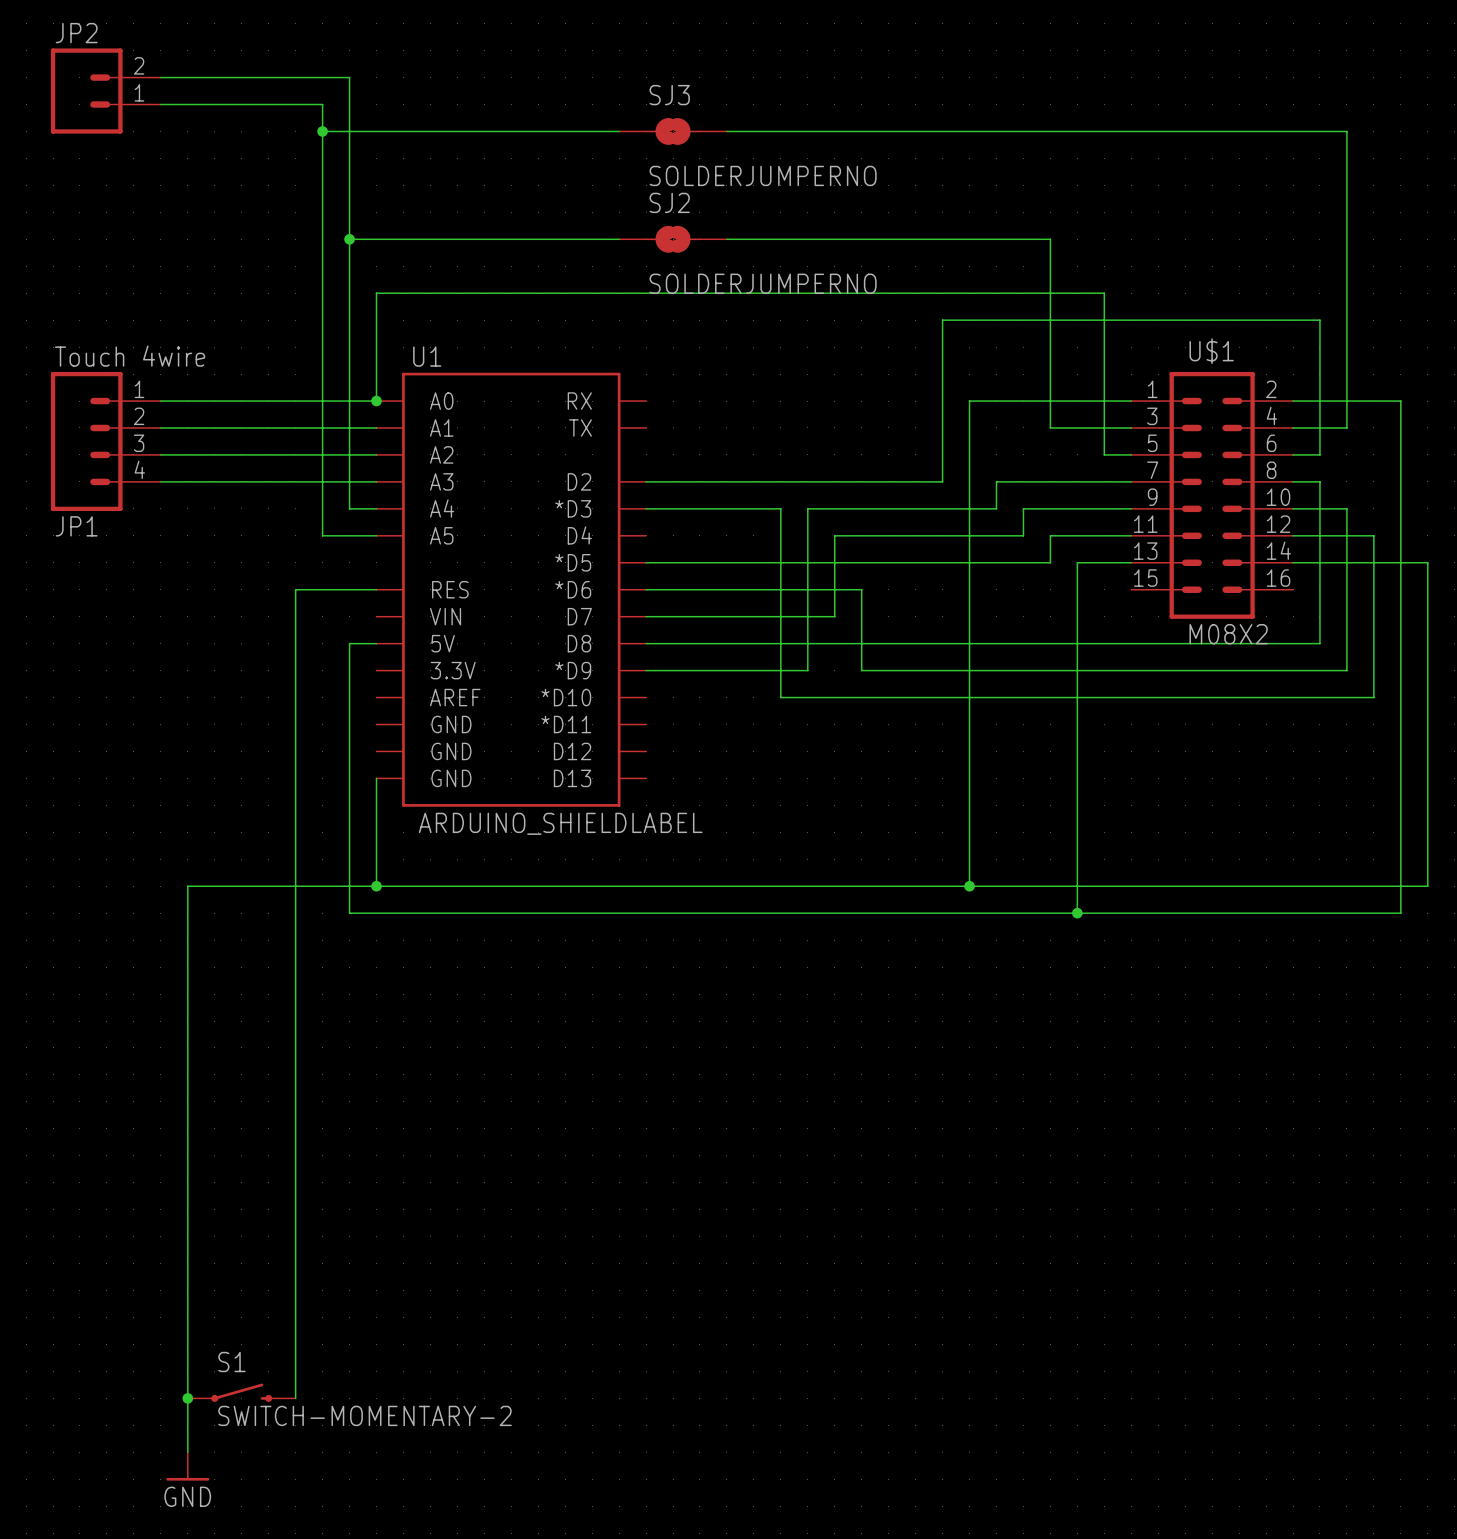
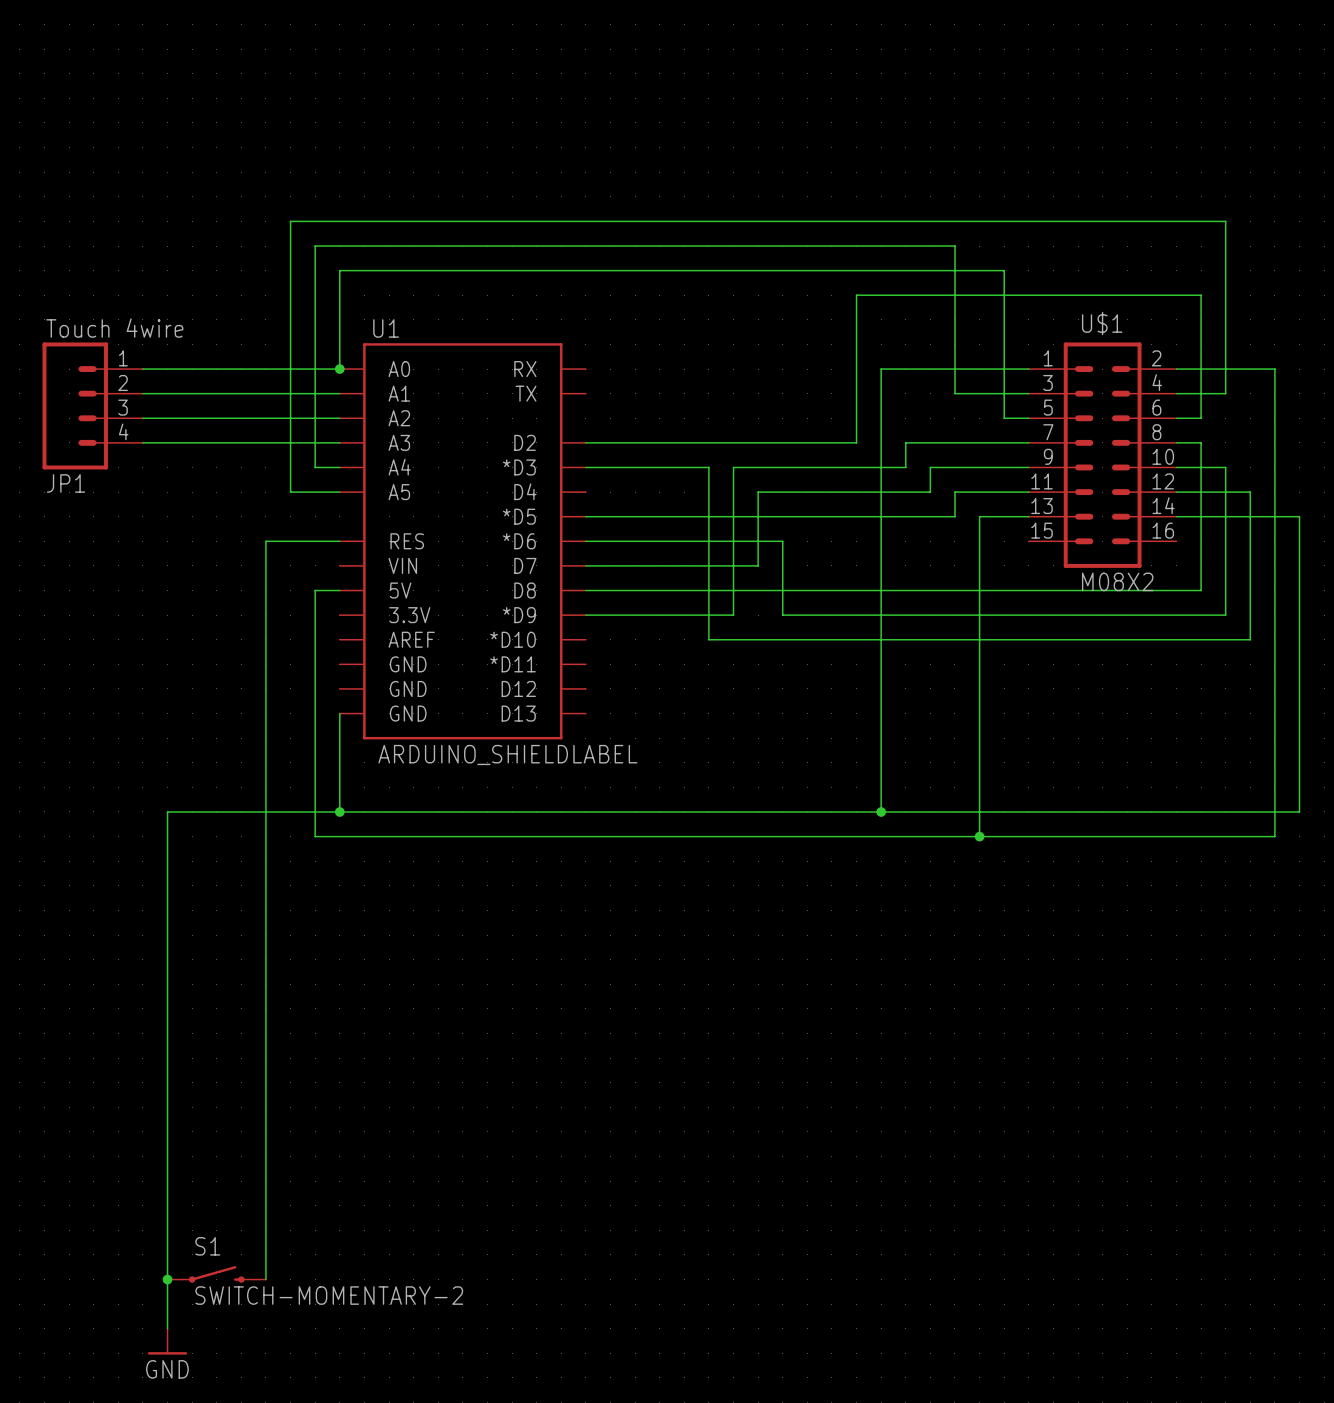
wire: (160, 77) (349, 77) (349, 266) -> (954, 246) (315, 246)
JP2: (105, 91) -> none
wire: (160, 104) (322, 104) (322, 239) -> (315, 221) (290, 221)
wire: (322, 131) (619, 131) -> none
junction: (322, 131) -> none
SJ3: SOLDERJUMPERNO (673, 131) -> none
wire: (726, 131) (1346, 131) (1346, 239) -> none
junction: (349, 239) -> none
SJ2: SOLDERJUMPERNO (673, 239) -> none
wire: (1050, 239) (1050, 266) -> (954, 221) (1225, 221)

